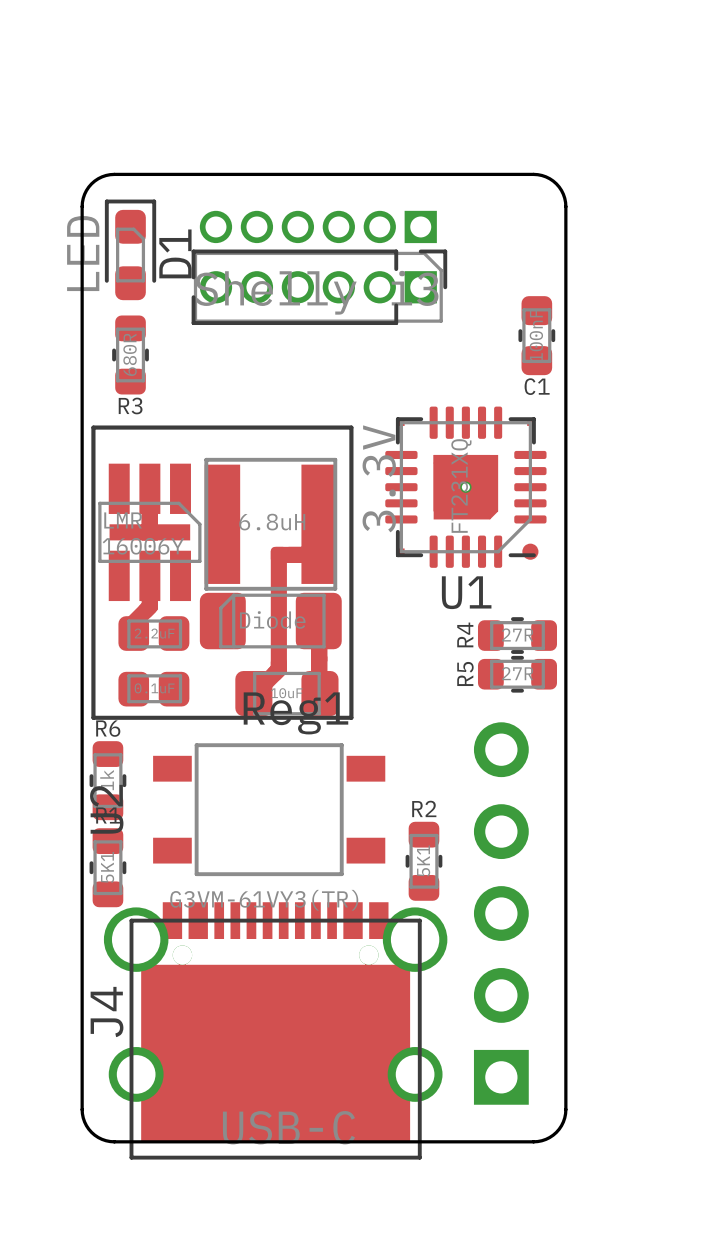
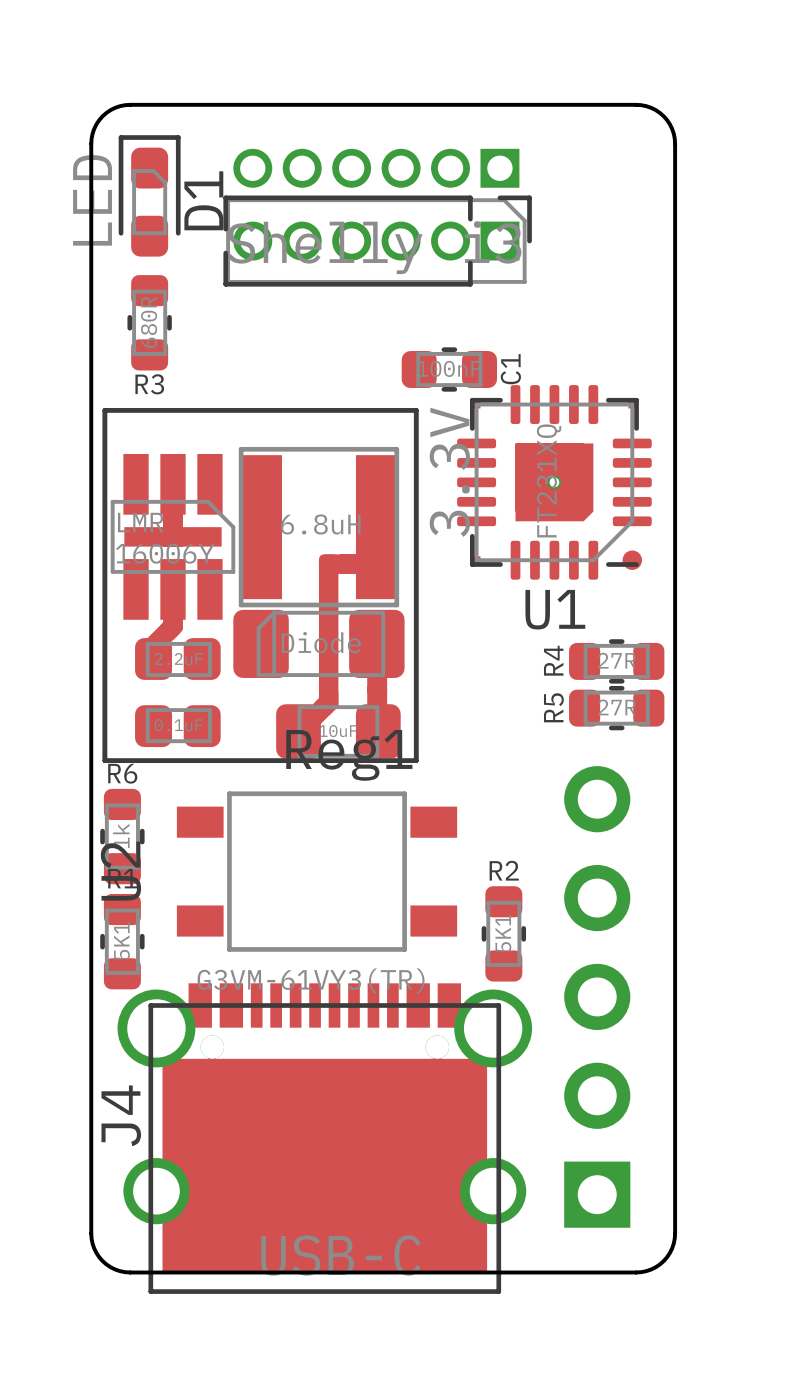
C1 rotation: 0° (536, 335) -> 90° clockwise (449, 369)
C1 position: (536, 335) -> (449, 369)
C1 name position: C1 (537, 386) -> C1 (510, 369)

